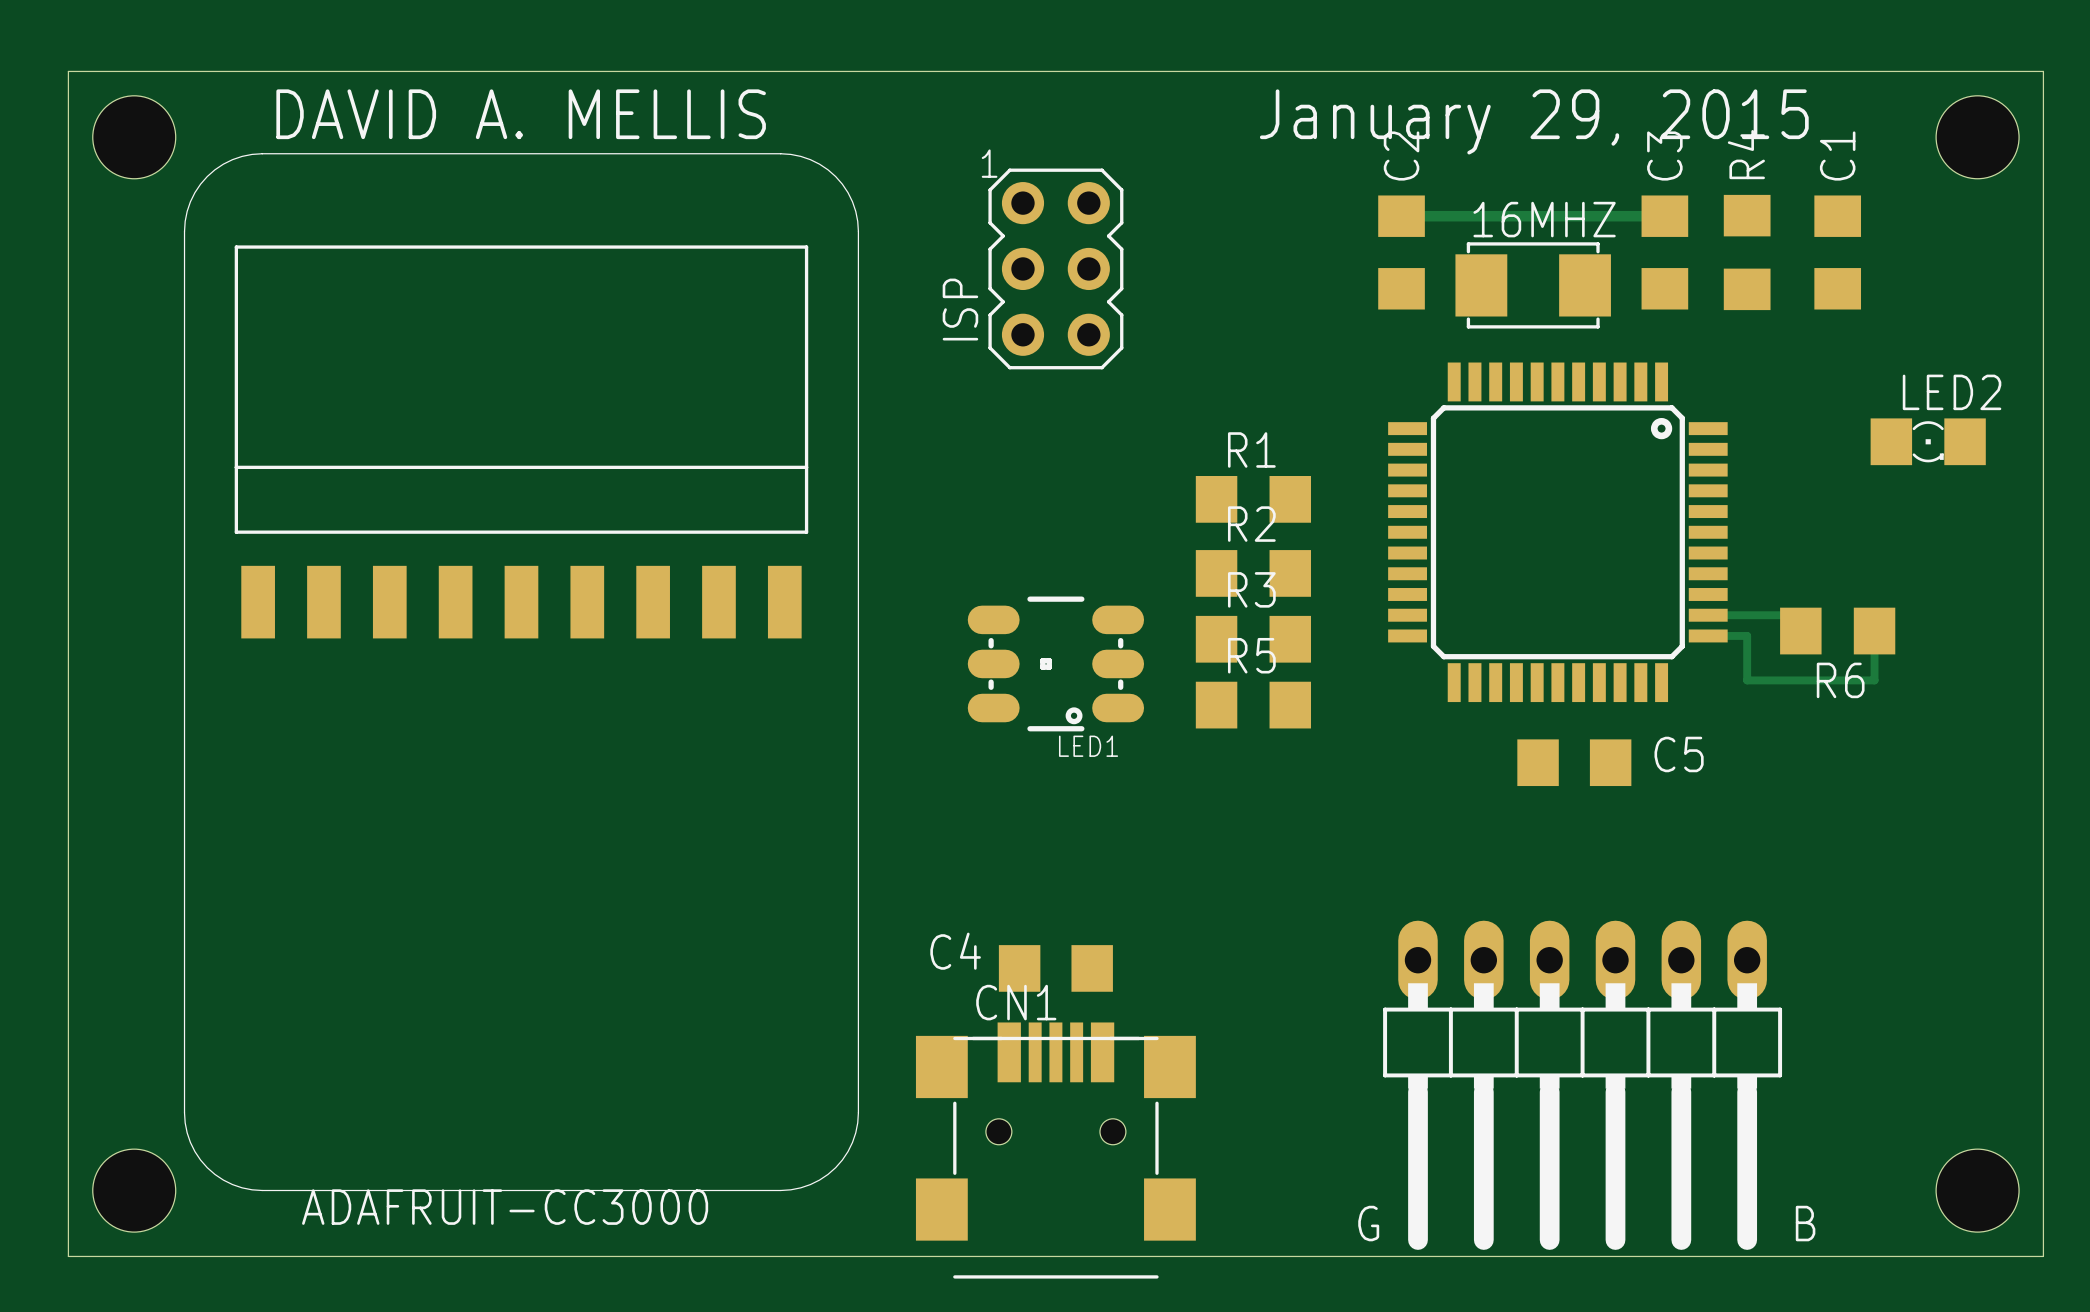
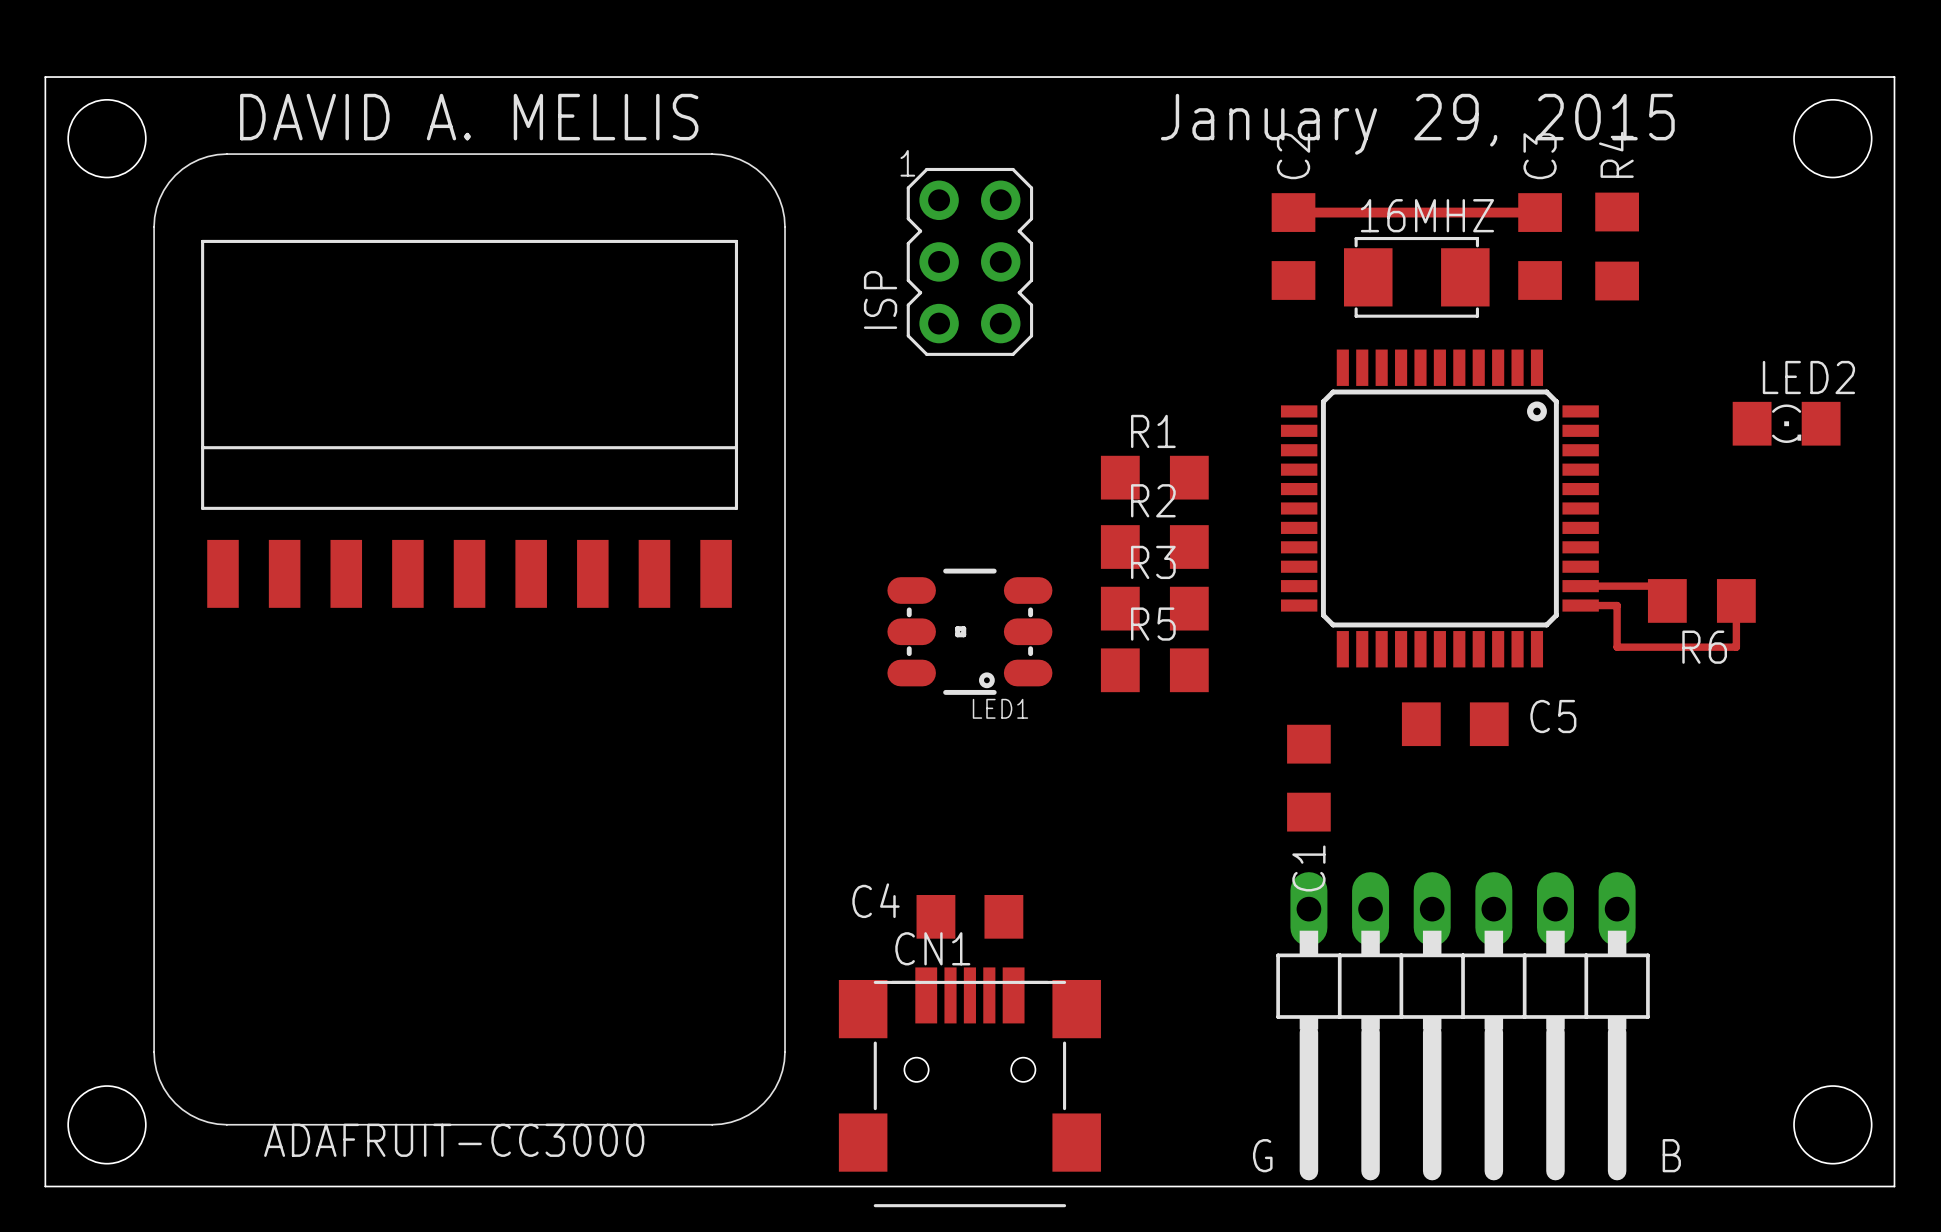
C1 name position: C1 (1837, 156) -> C1 (1308, 868)
C1 position: (1837, 252) -> (1308, 778)

